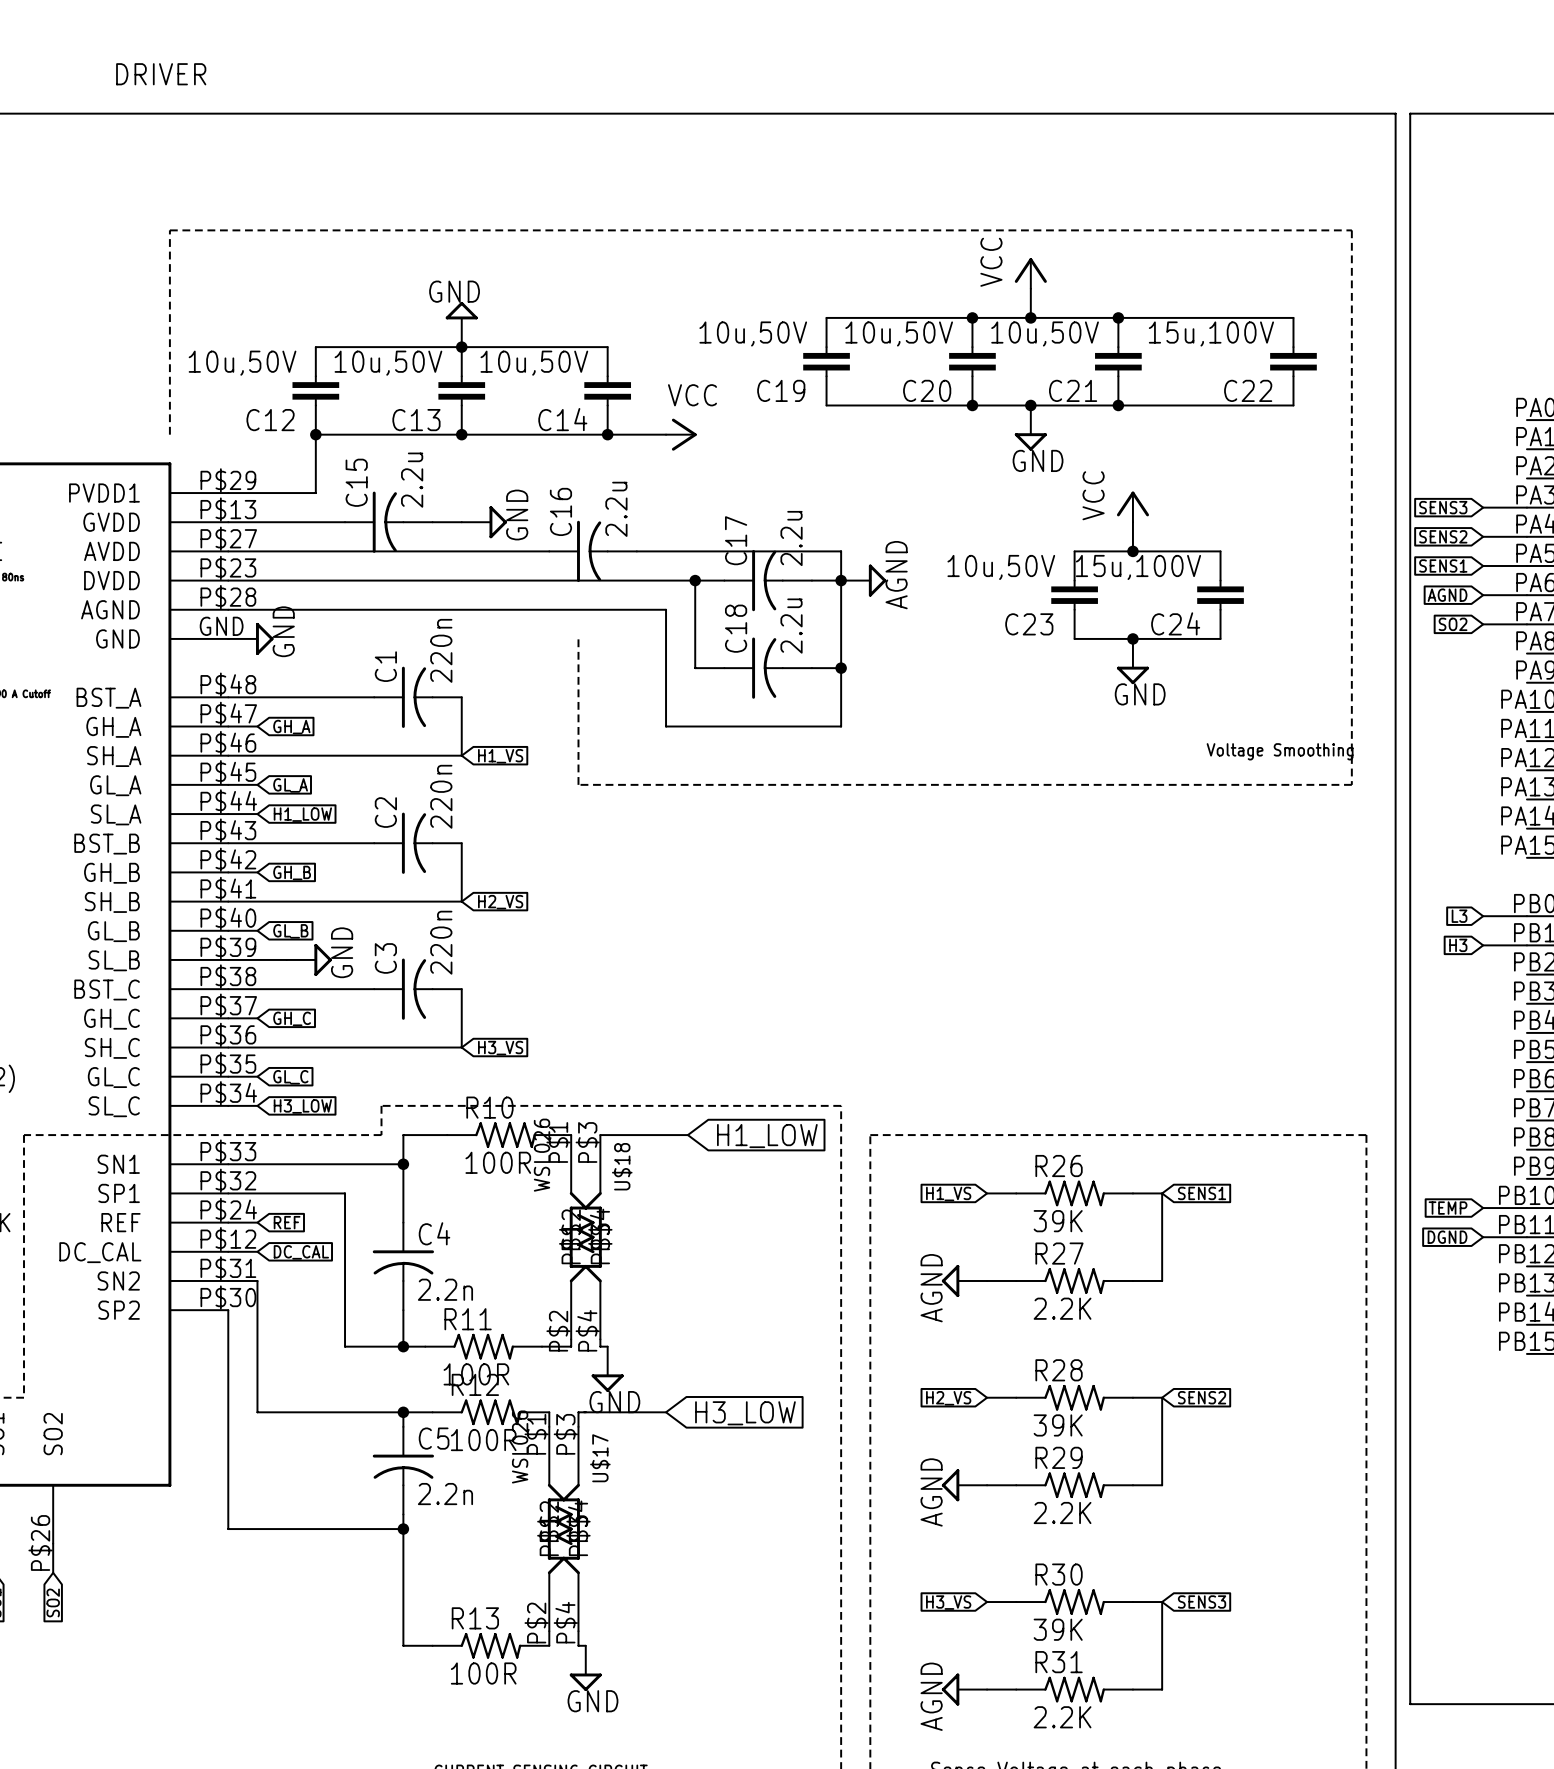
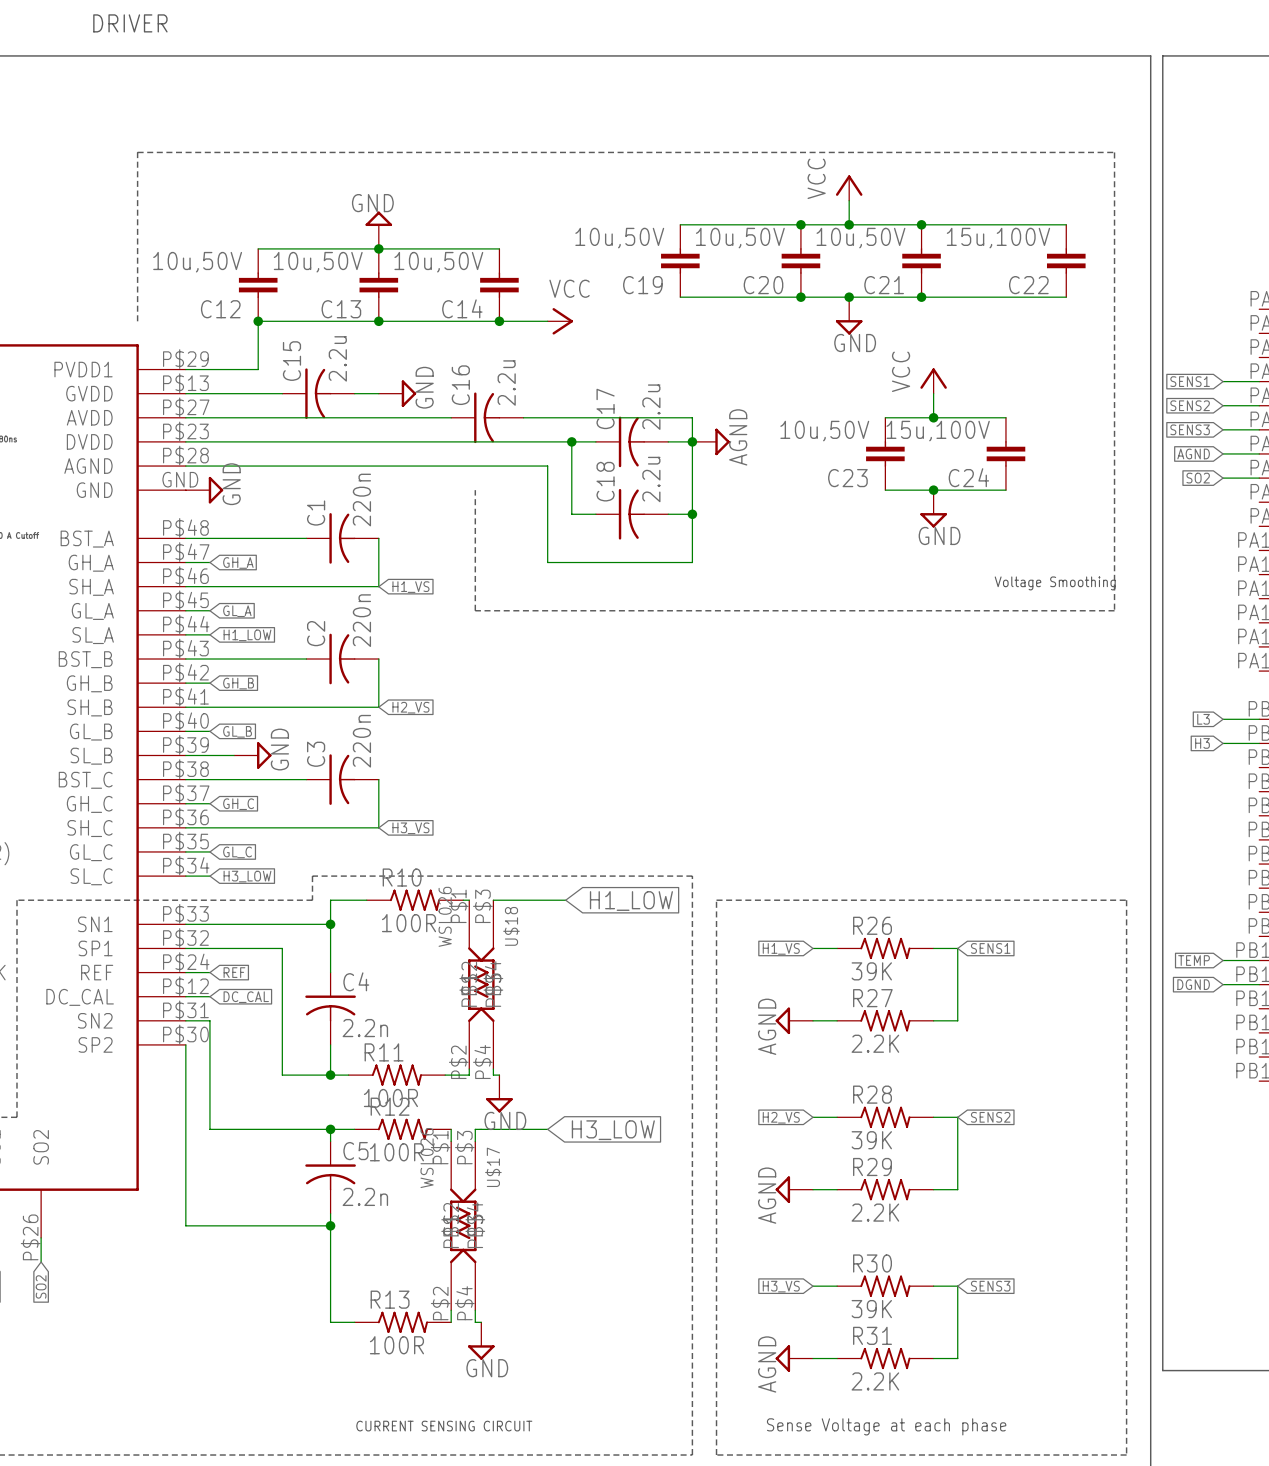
global label: SENS3 (1443, 507) -> SENS1 (1190, 381)
global label: SENS1 (1443, 565) -> SENS3 (1190, 429)

